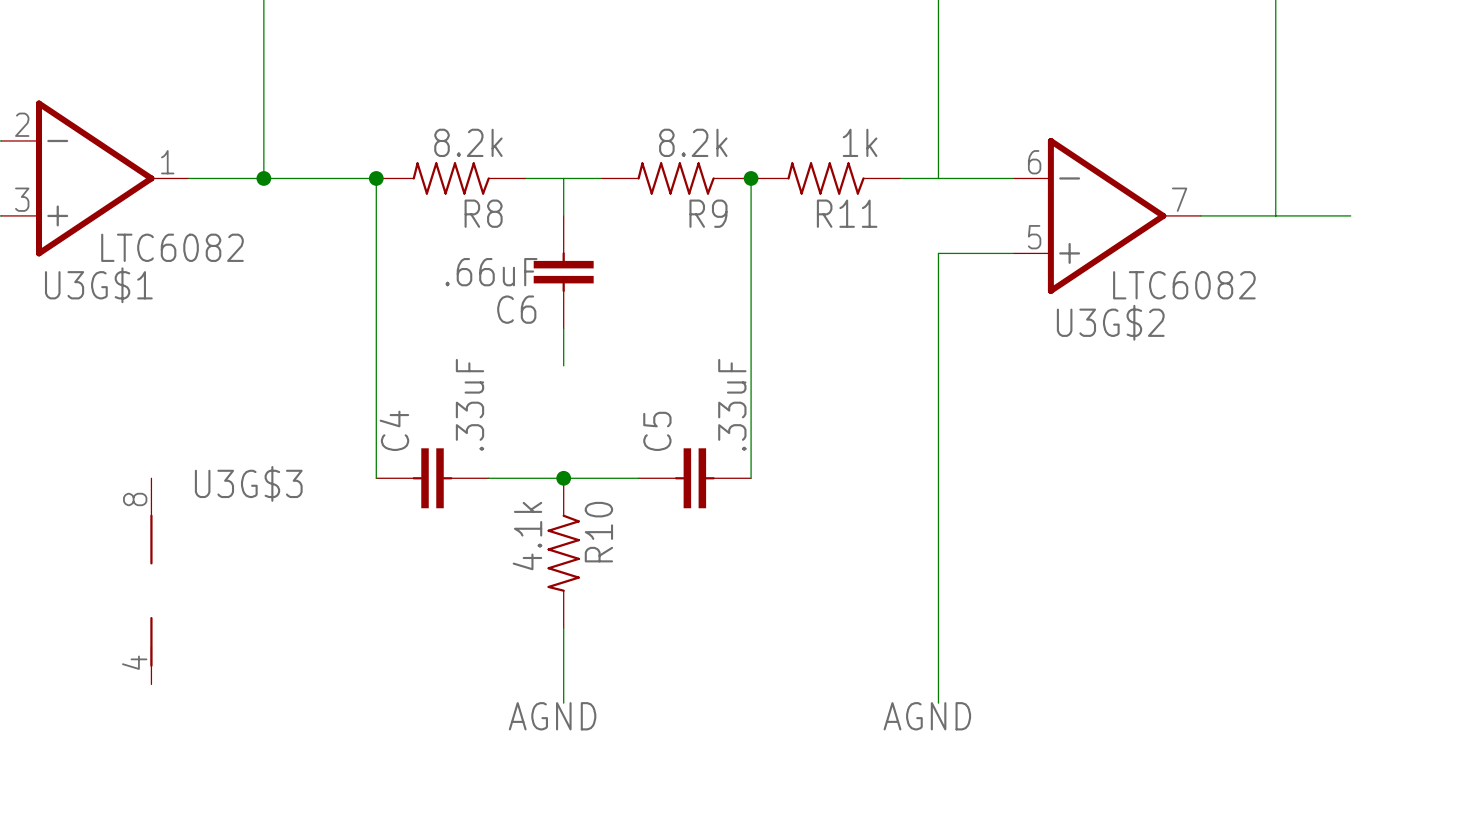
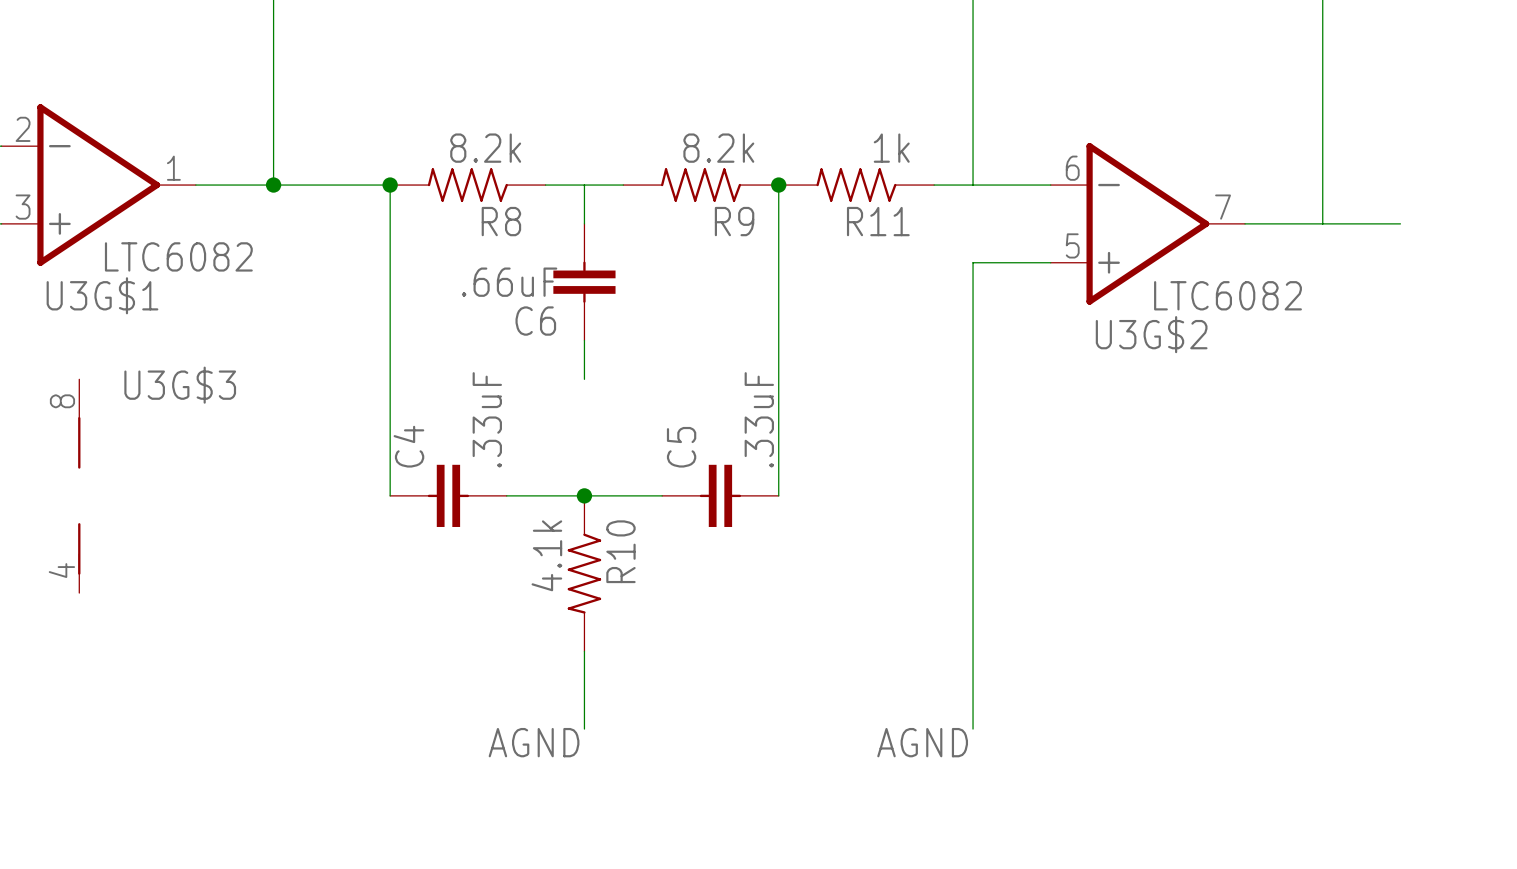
U3G$3 position: (151, 581) -> (79, 486)
label position: AGND (552, 716) -> AGND (534, 742)
label position: AGND (927, 716) -> AGND (922, 742)

